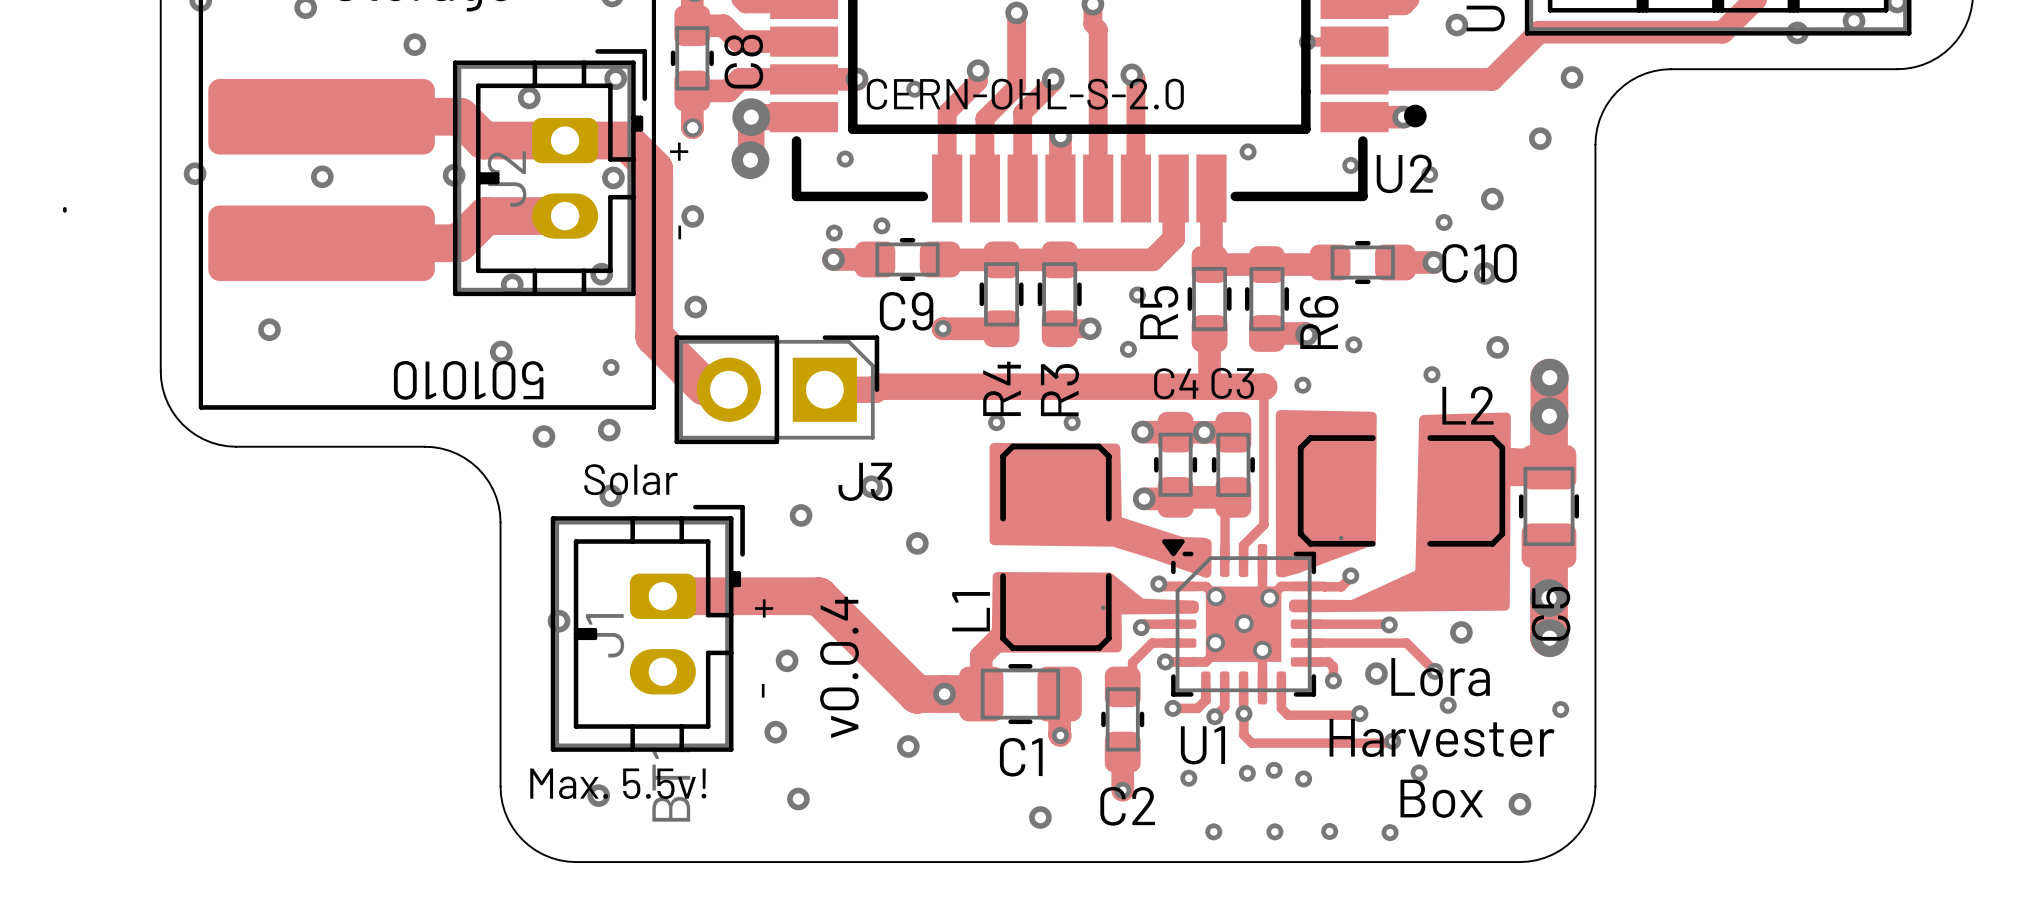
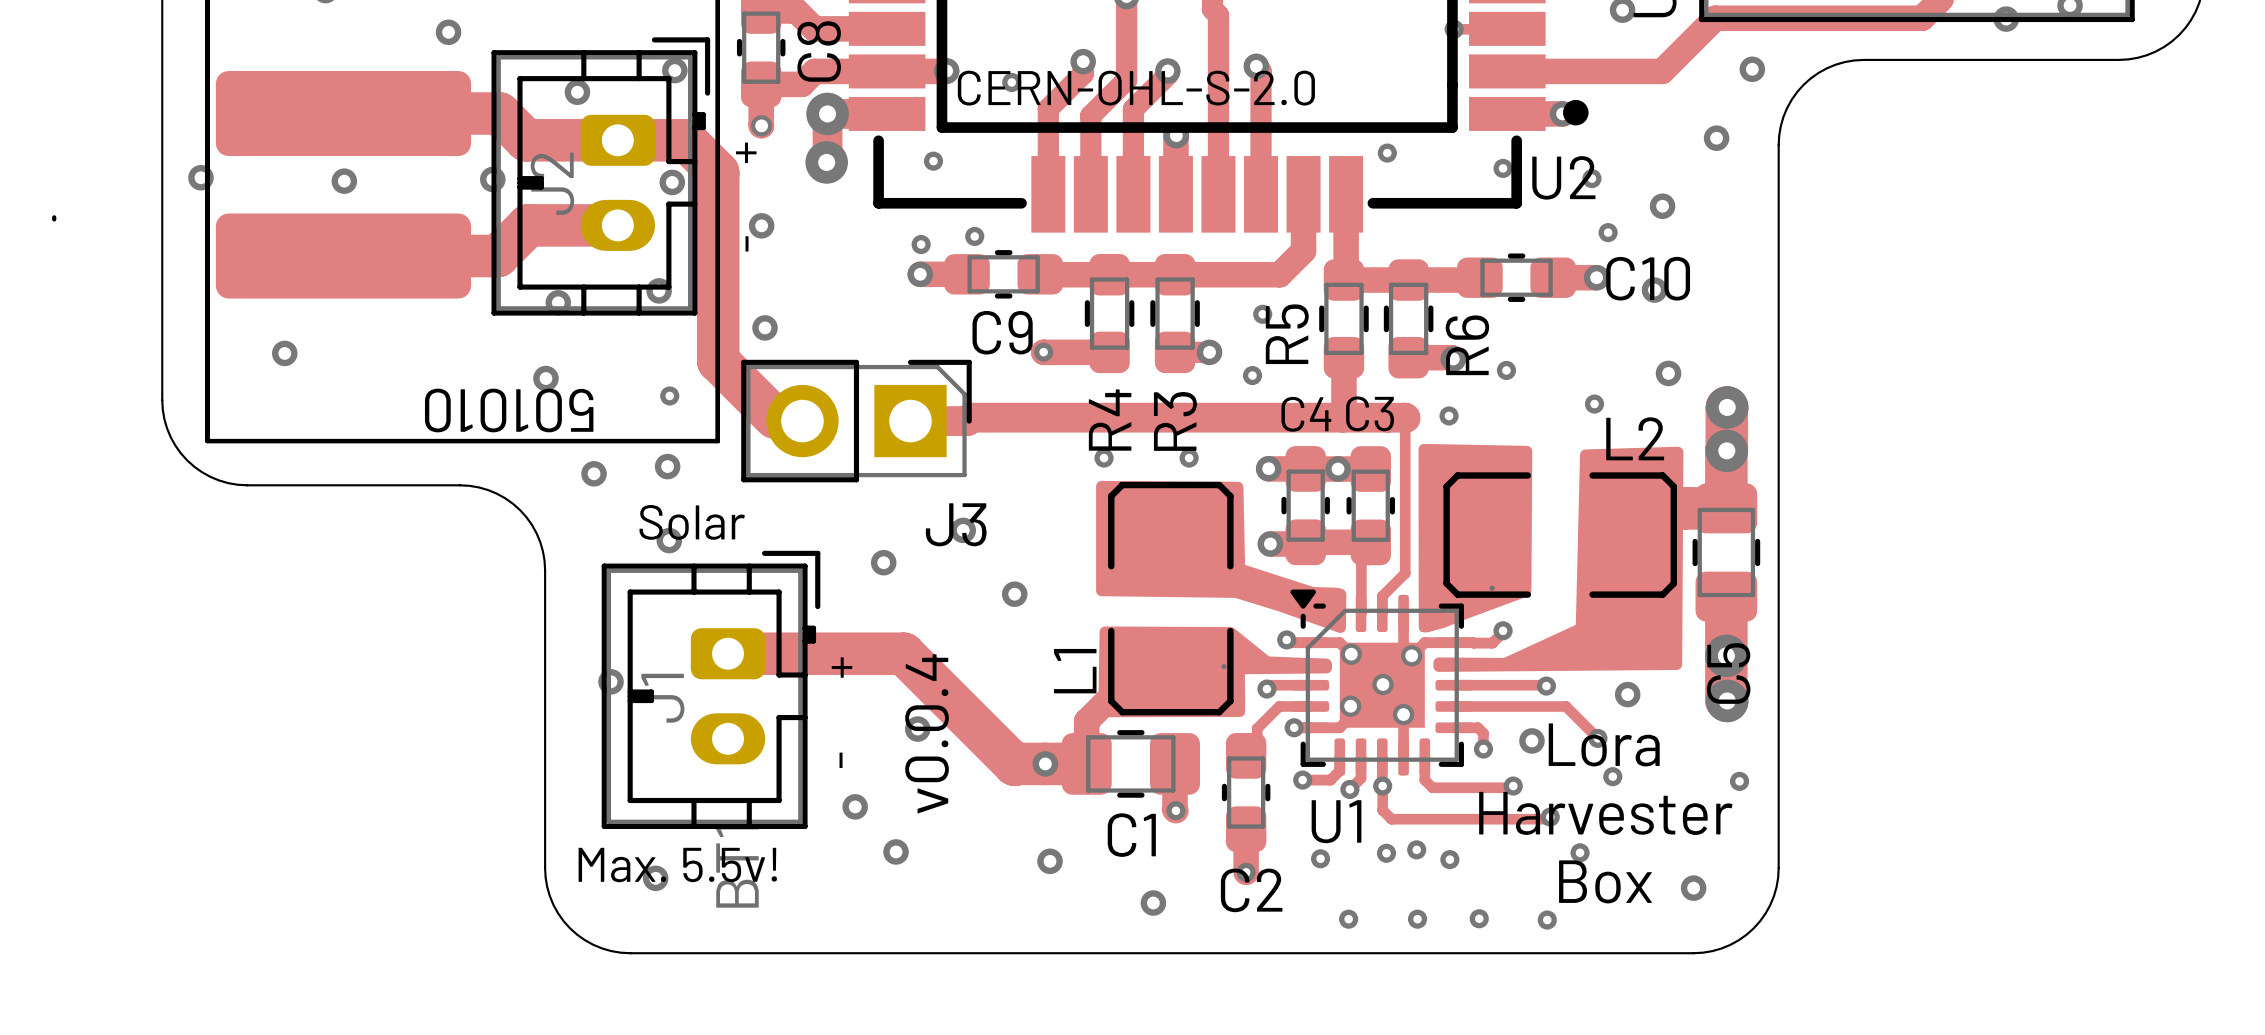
via position: (787, 660) -> (917, 729)
via: (908, 746) -> none
via: none -> (1050, 861)
via position: (798, 799) -> (896, 851)

